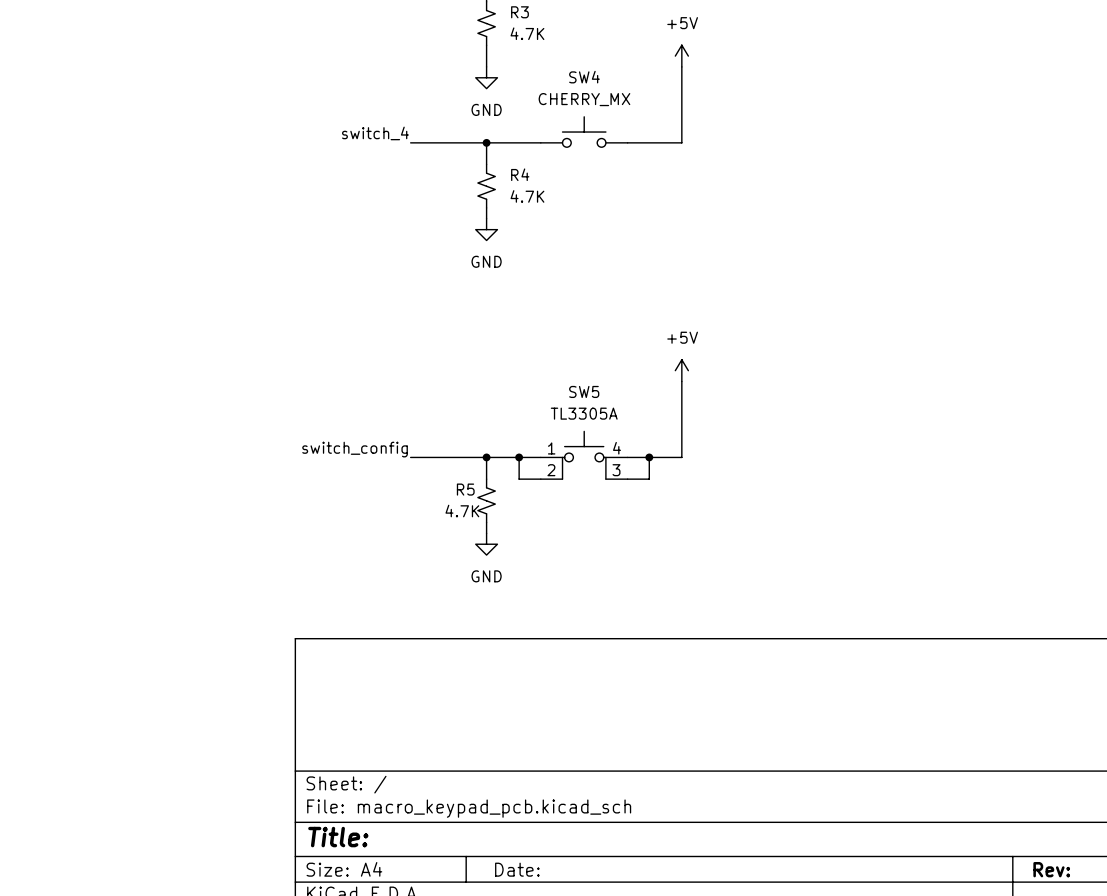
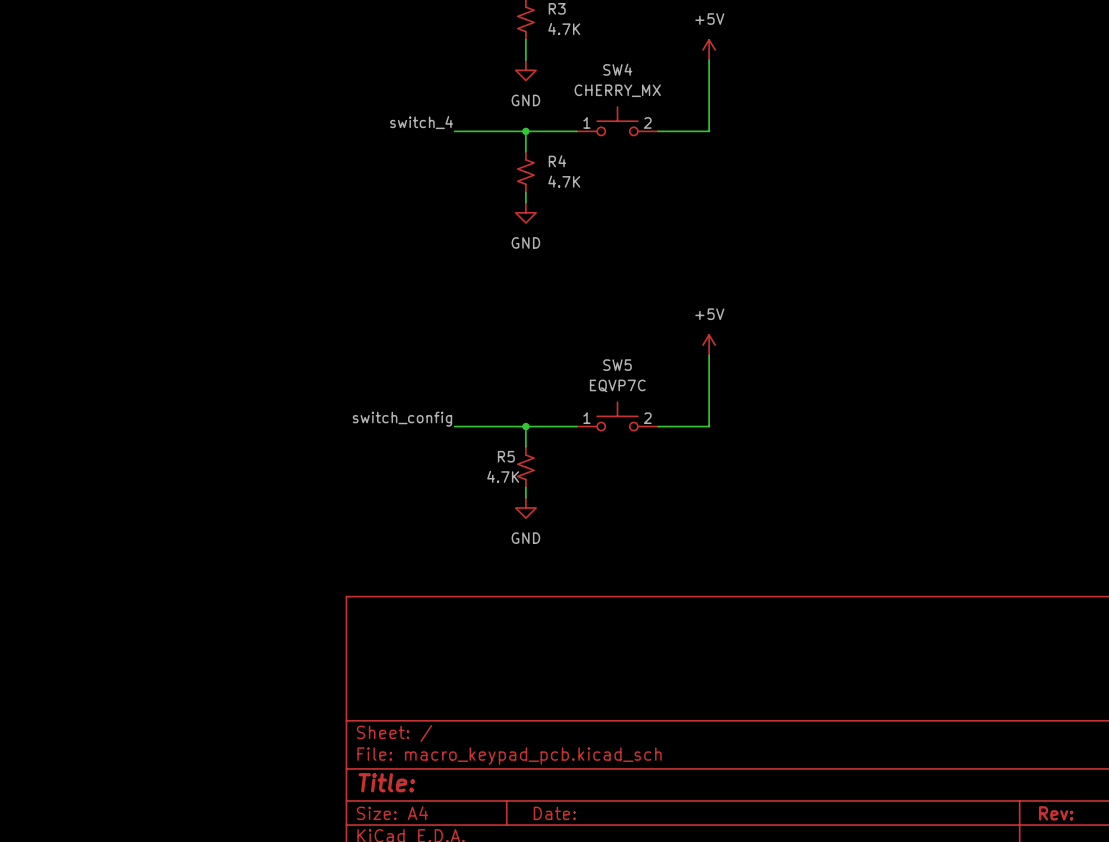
SW4 pin number: none -> 1 (586, 122)
SW4 pin number: none -> 2 (647, 122)
SW5 value: TL3305A (584, 413) -> EQVP7C (617, 385)
SW5 symbol: [540, 431, 628, 480] -> [576, 402, 659, 431]
wire: (519, 457) (519, 479) (540, 479) -> none
junction: (519, 457) -> none
wire: (649, 457) (649, 479) (627, 479) -> none
junction: (649, 457) -> none

